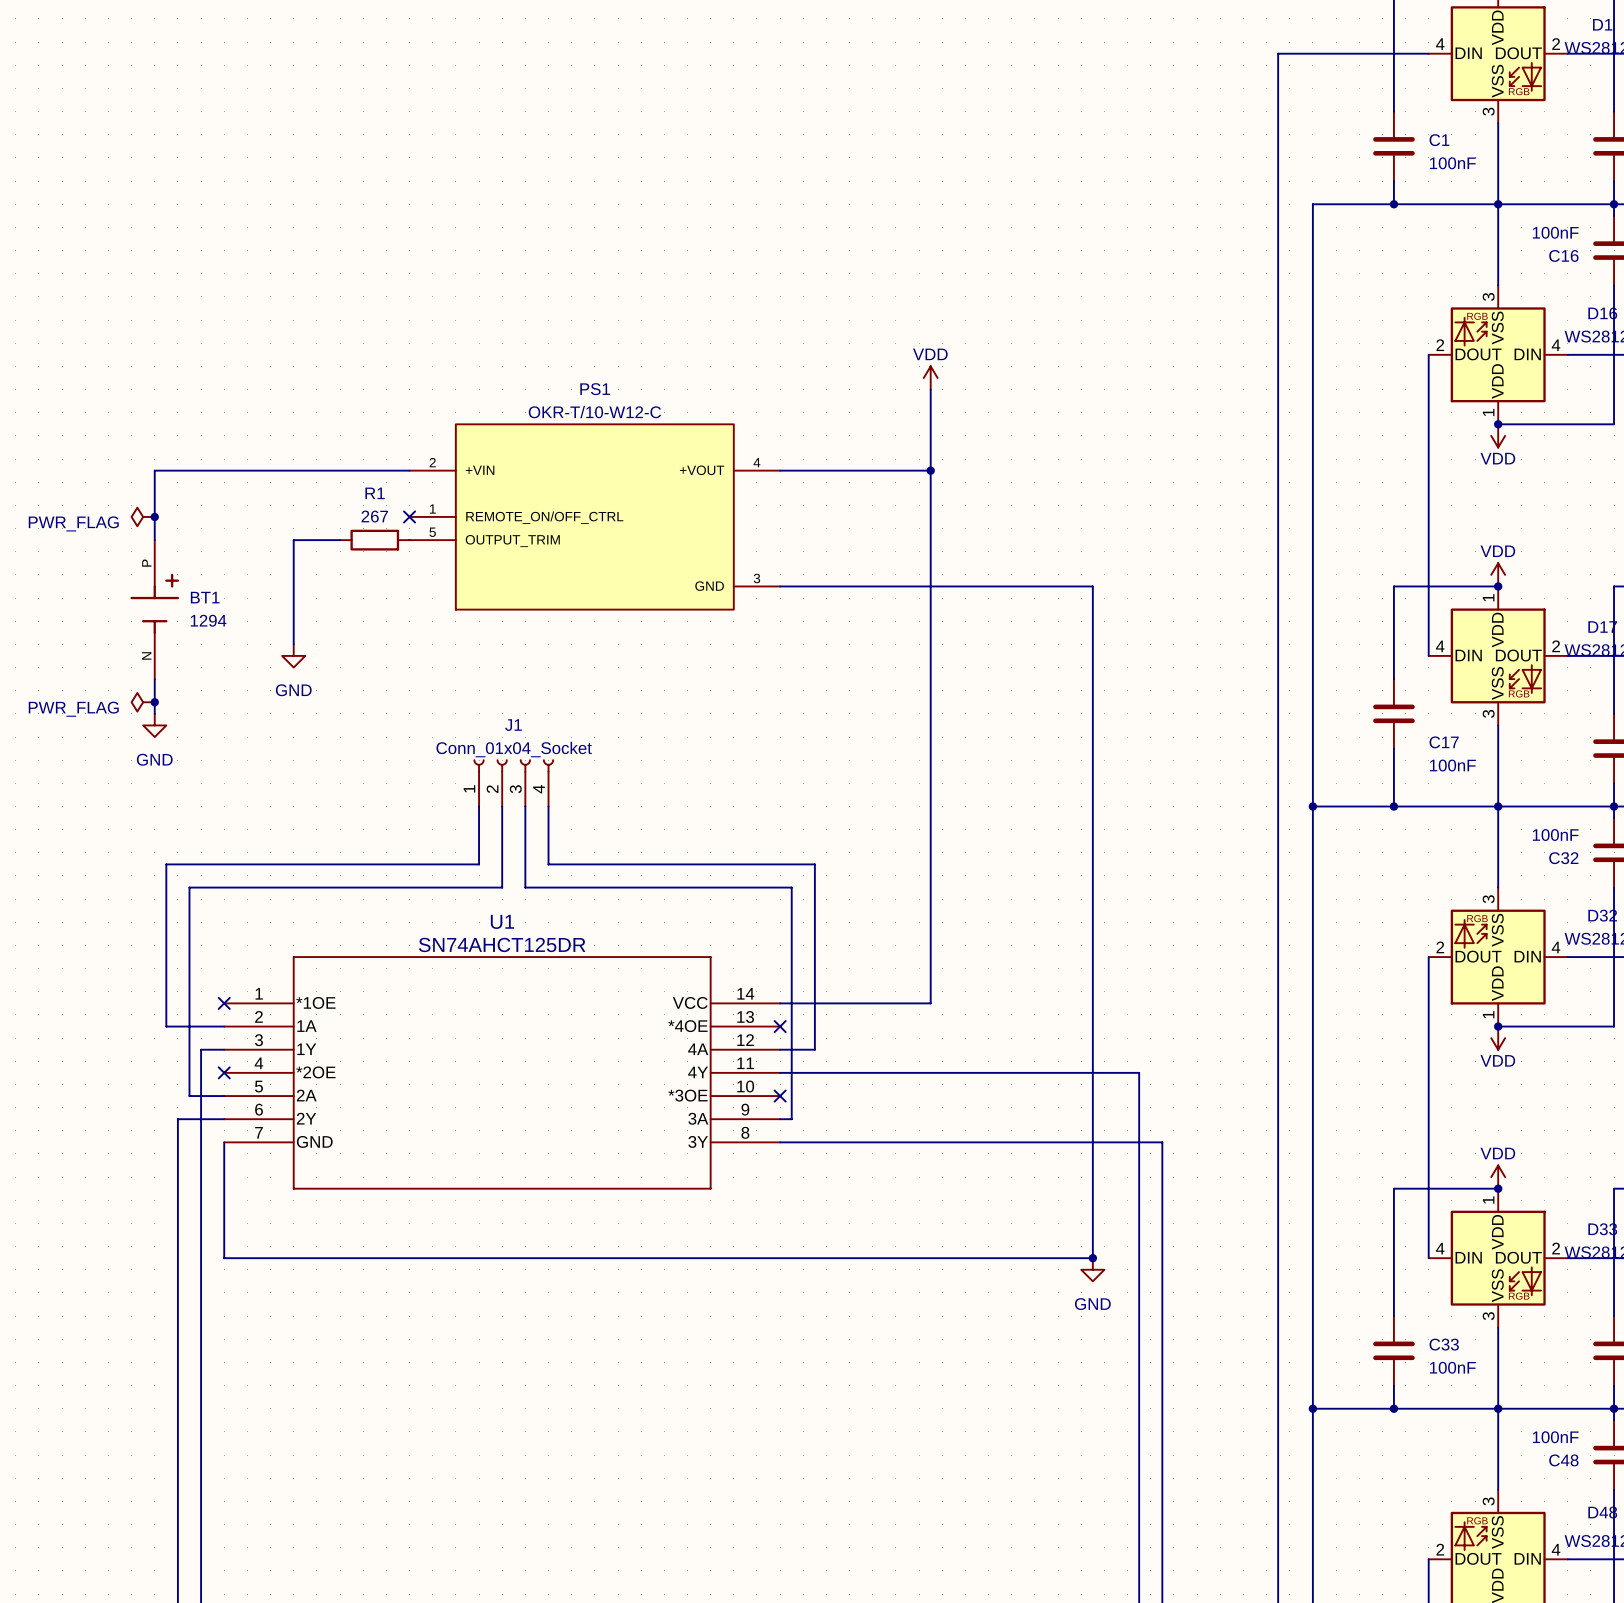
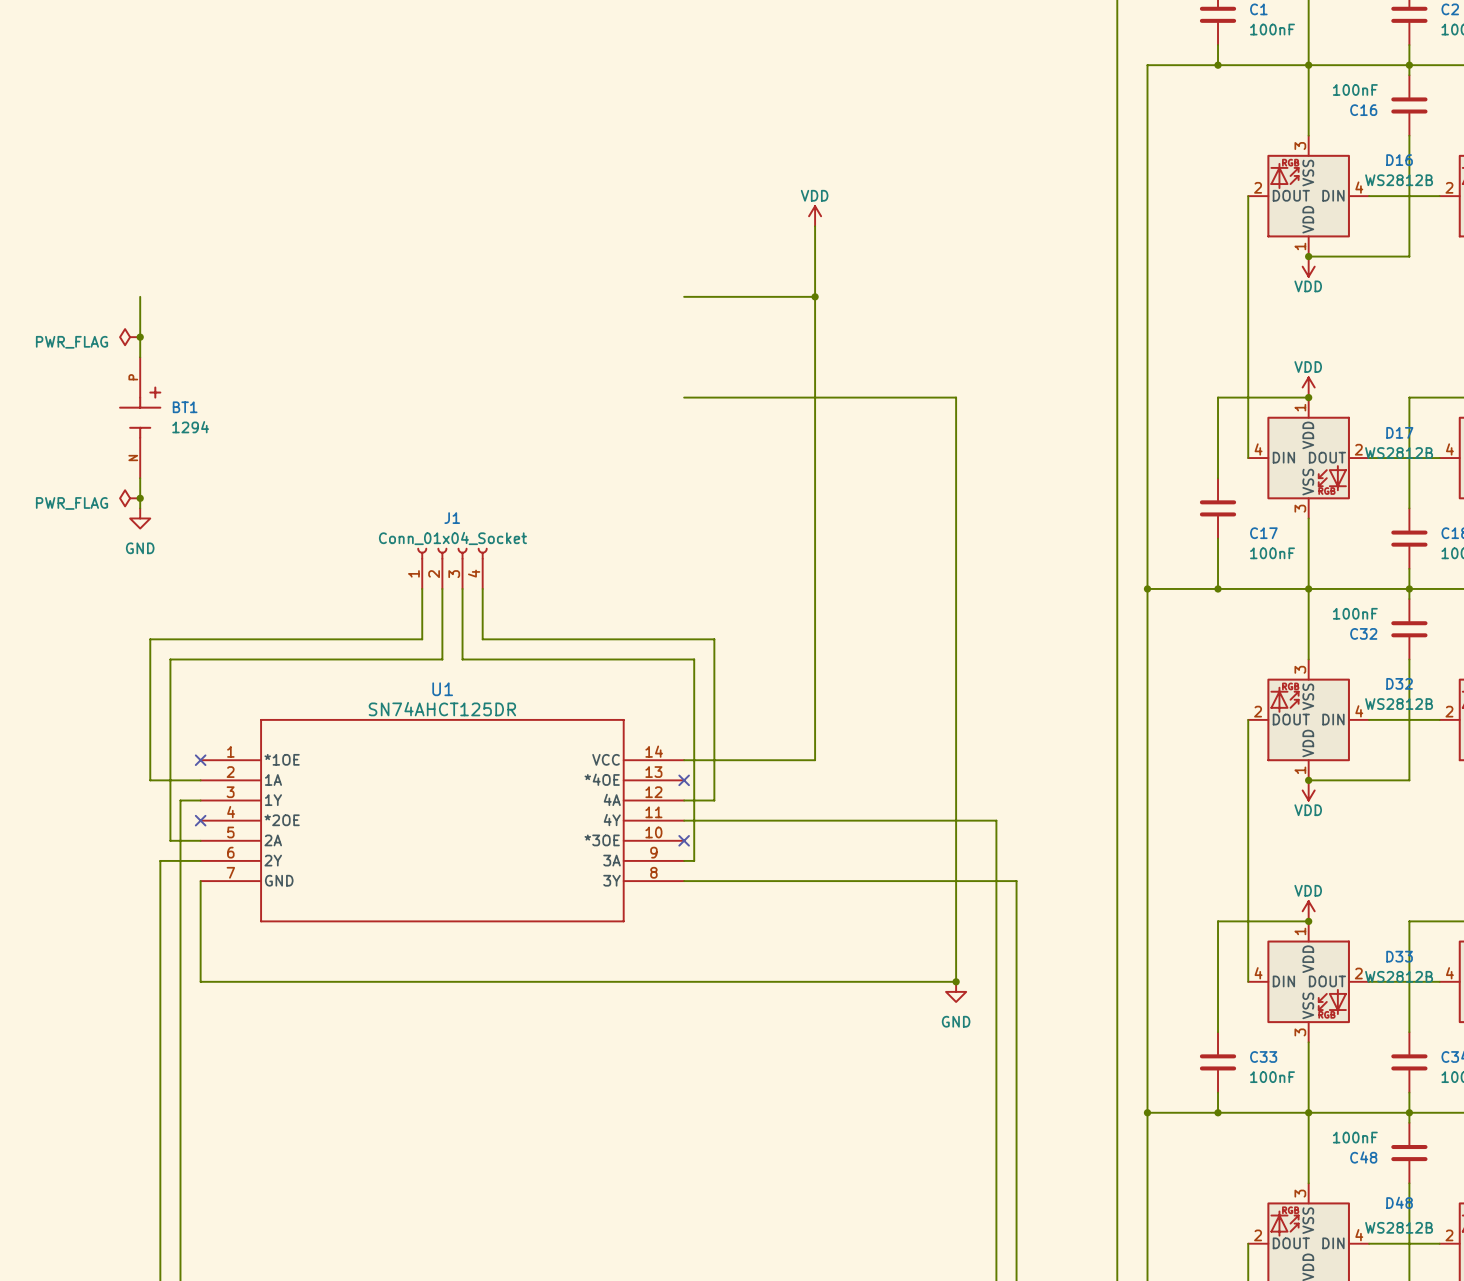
wire: (154, 470) (409, 470) -> none
no-connect mark: (409, 516) -> none
PS1: OKR-T/10-W12-C (594, 516) -> none
wire: (340, 540) (293, 540) (293, 644) -> none
R1: 267 (374, 540) -> none
power symbol: GND (293, 655) -> none

